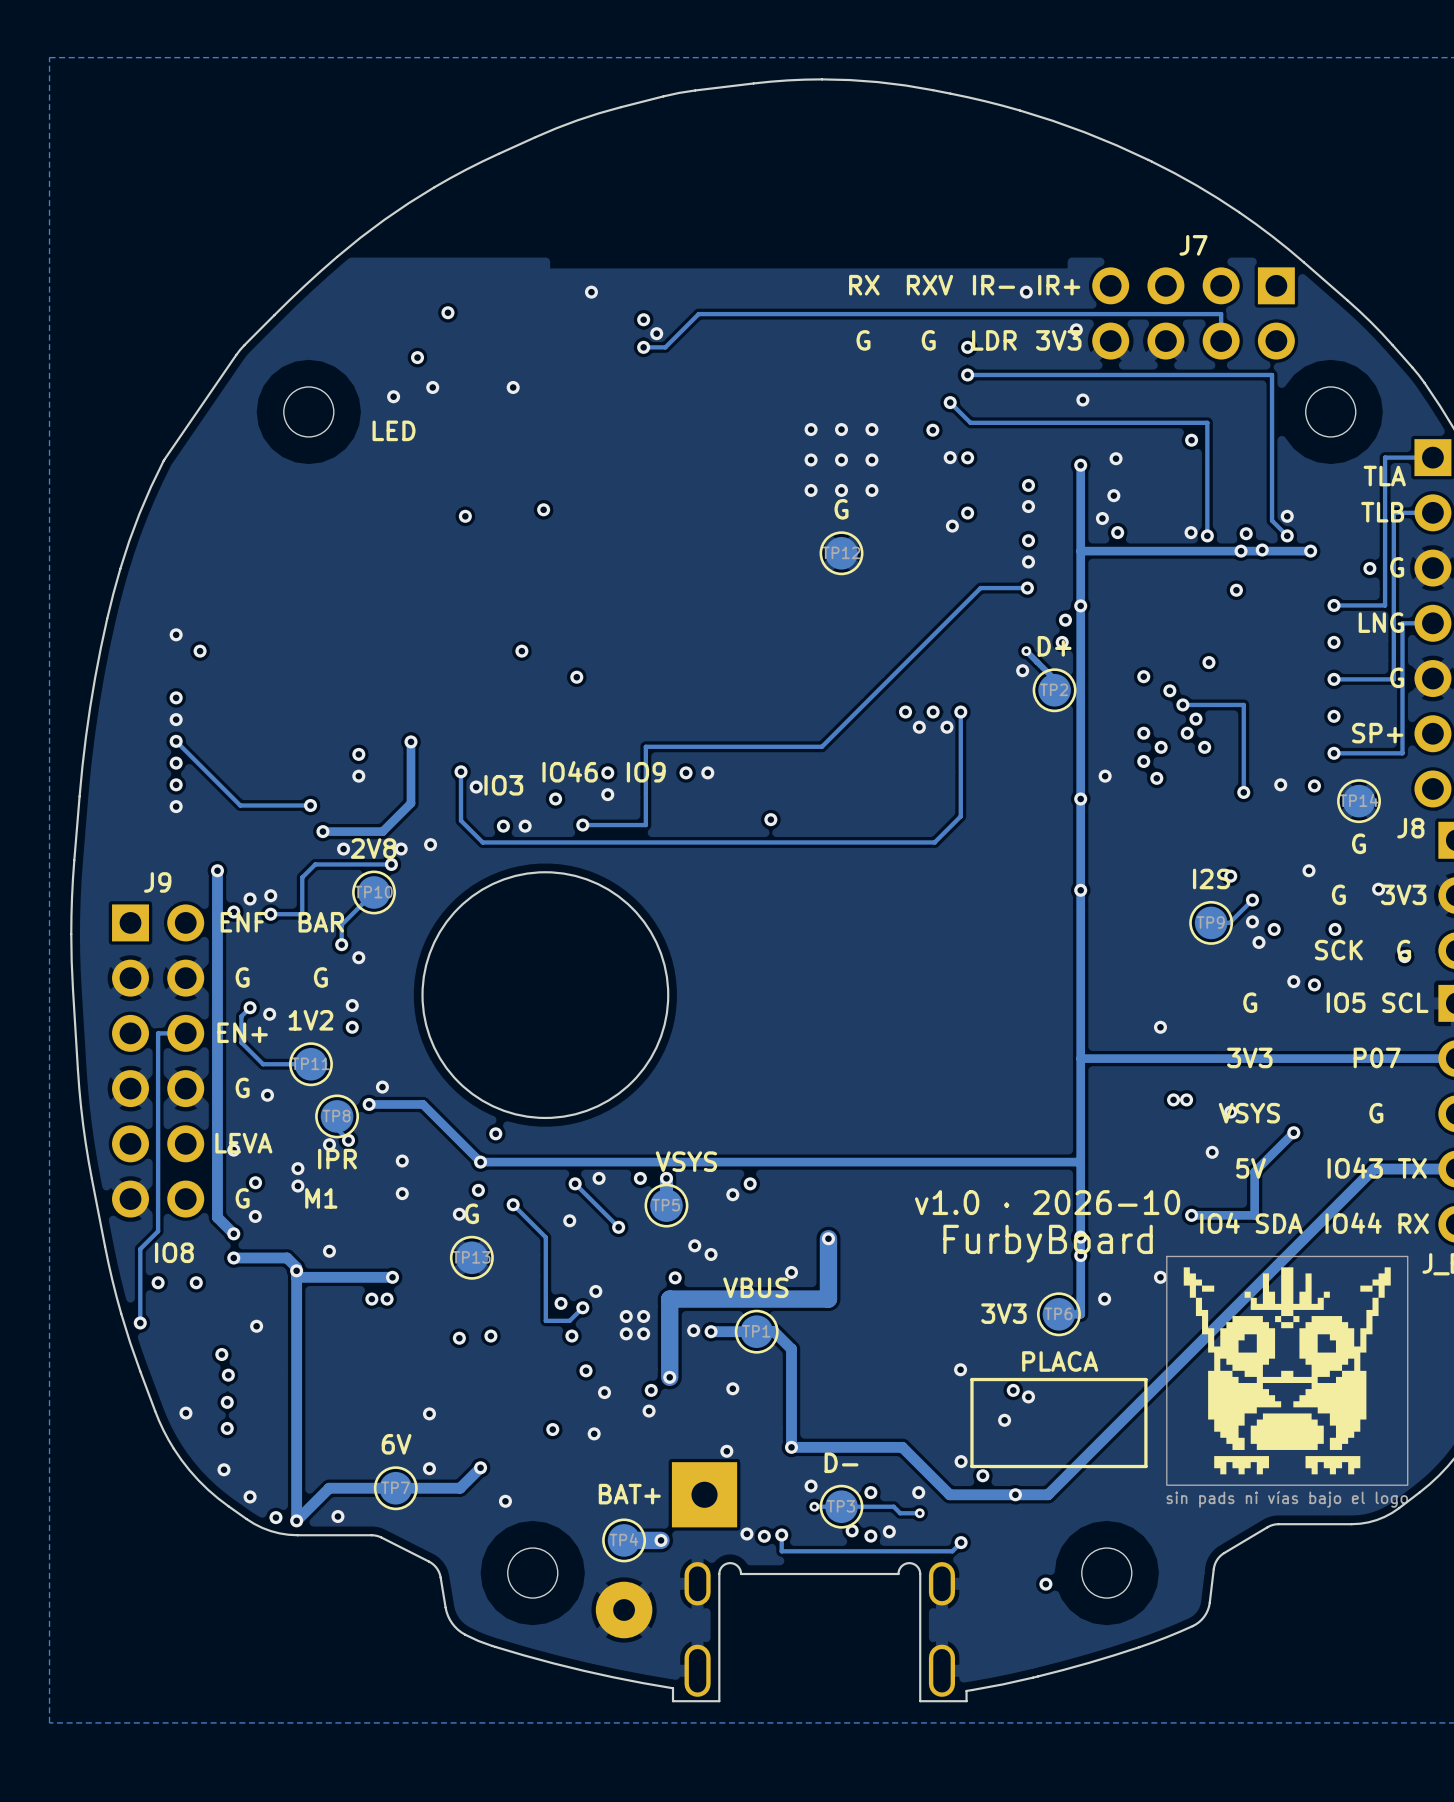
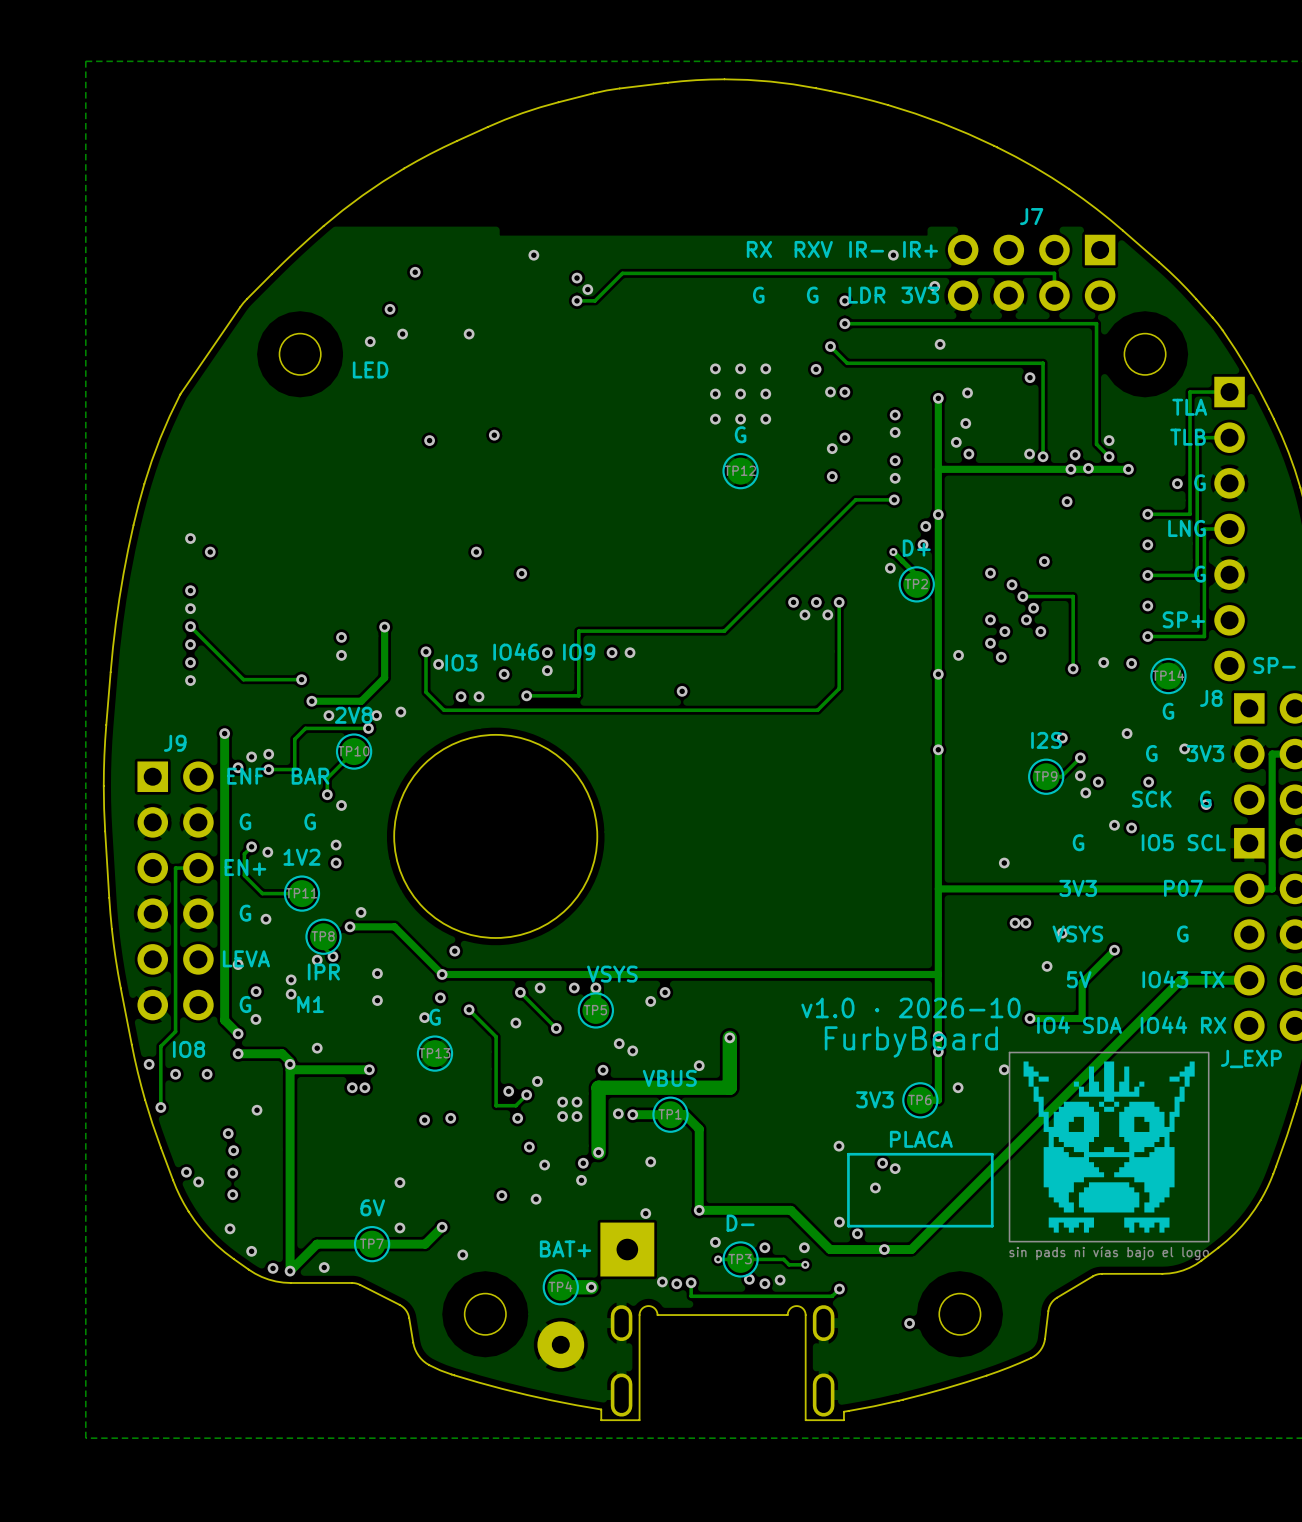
via: none -> (832, 476)
via: none -> (149, 1064)
via: none -> (186, 1172)

